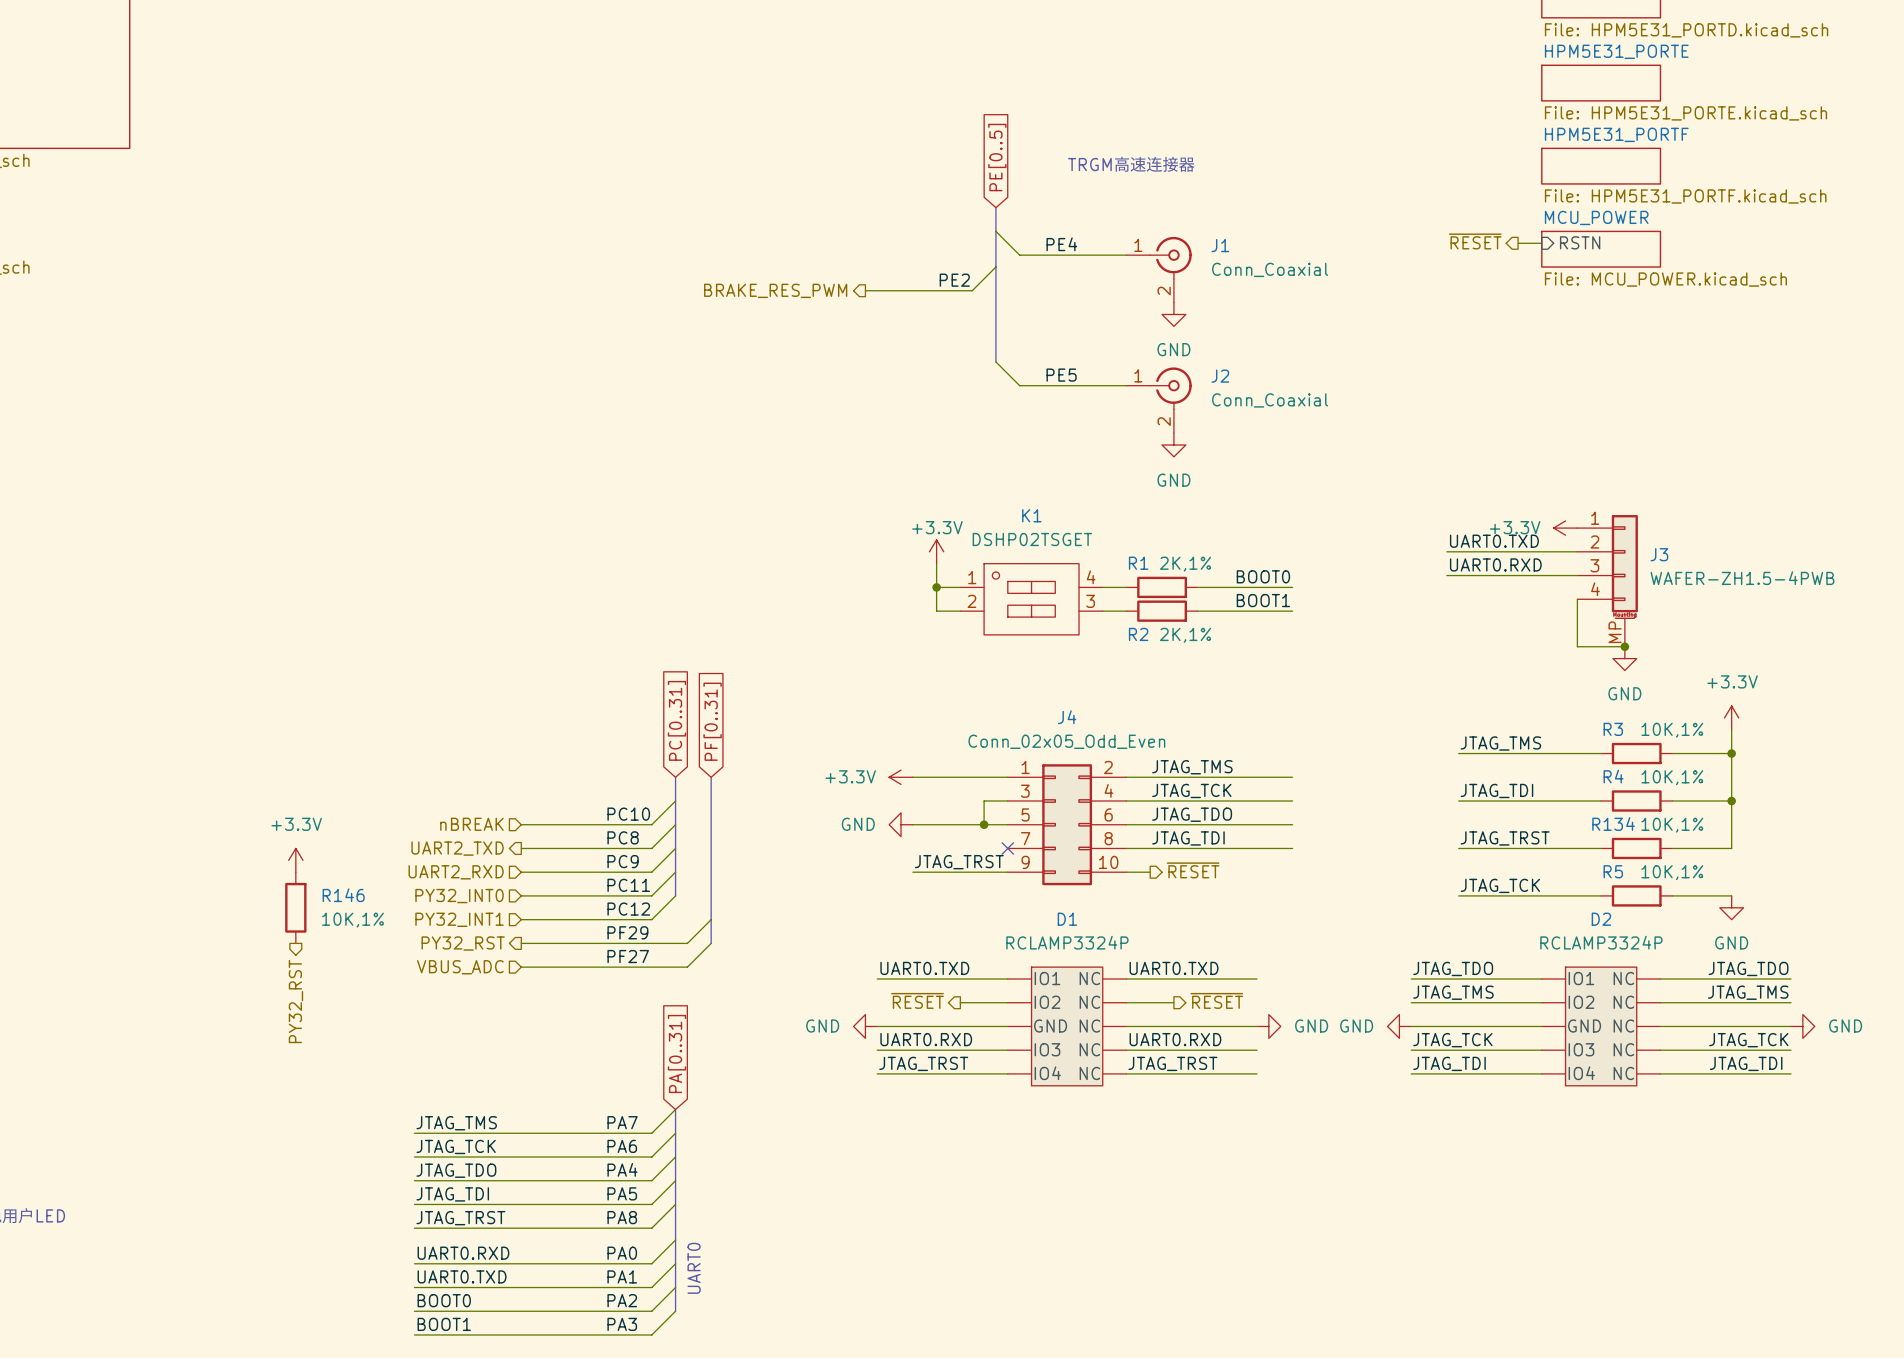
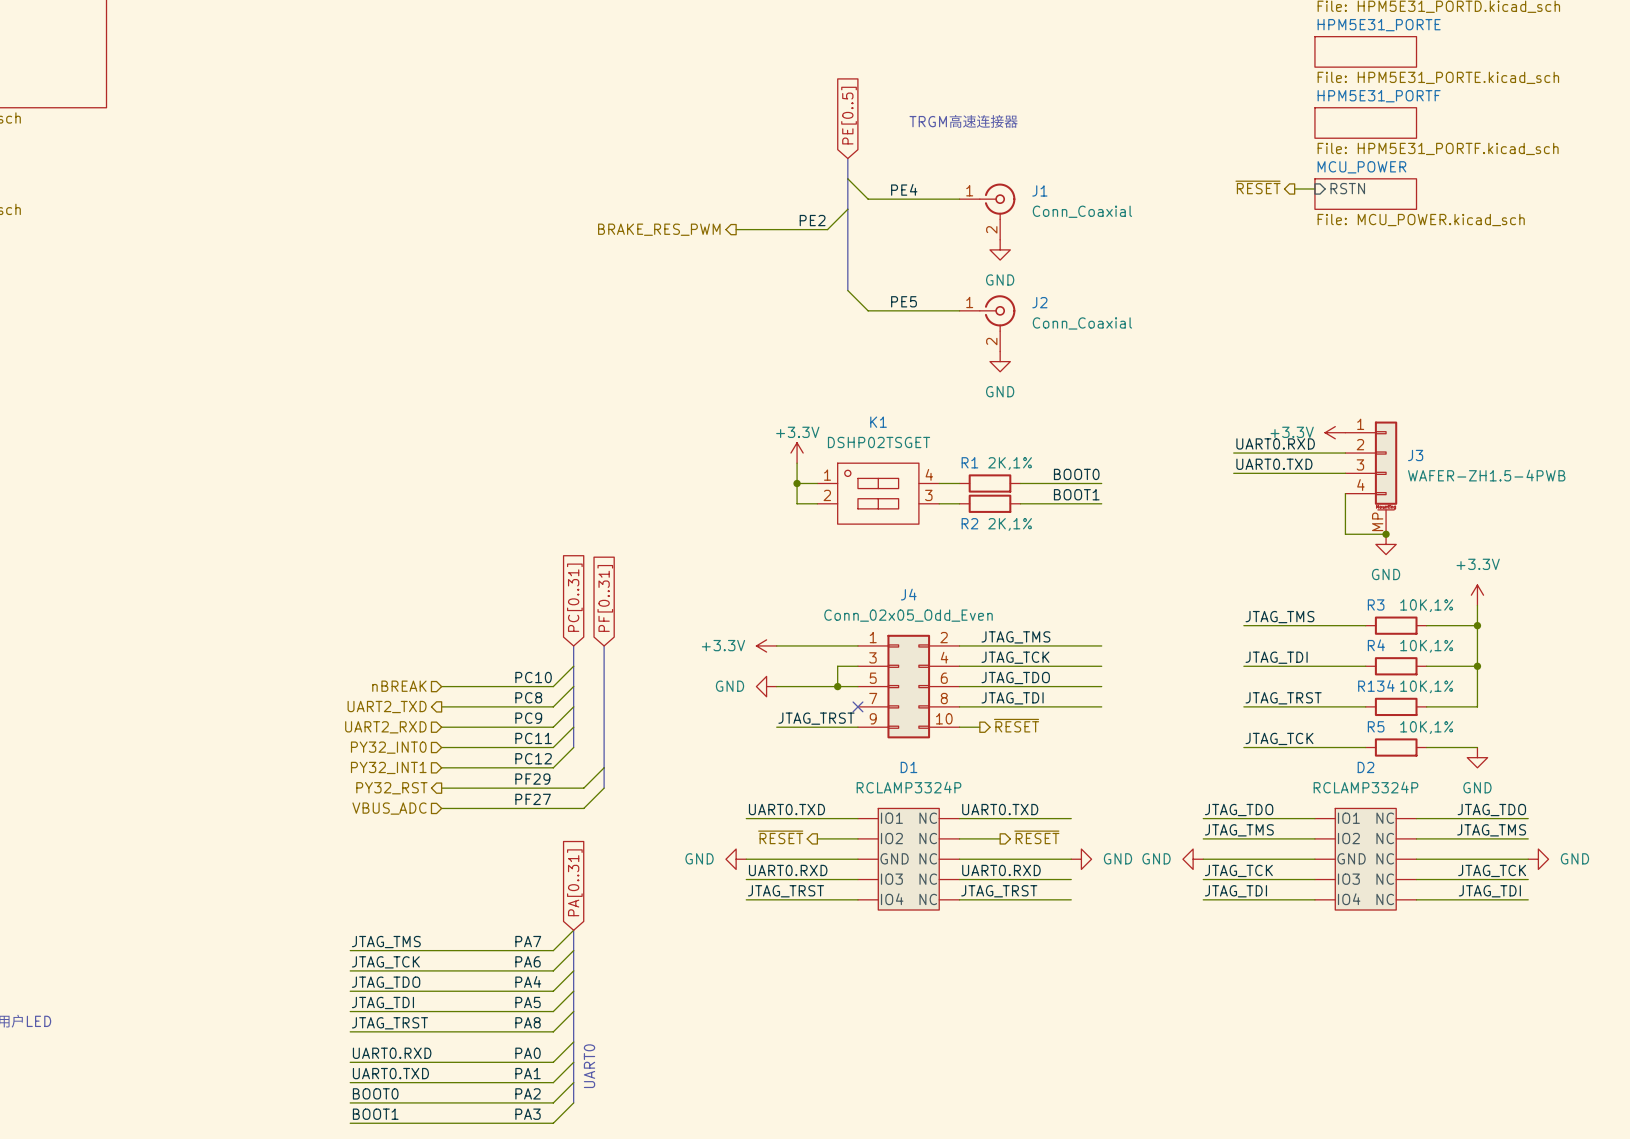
label: UART0.TXD (1494, 541) -> UART0.RXD (1275, 443)
label: UART0.RXD (1495, 564) -> UART0.TXD (1274, 464)
power symbol: +3.3V (295, 860) -> none
R146: 10K,1% (295, 907) -> none
hierarchical label: PY32_RST (295, 1001) -> none

